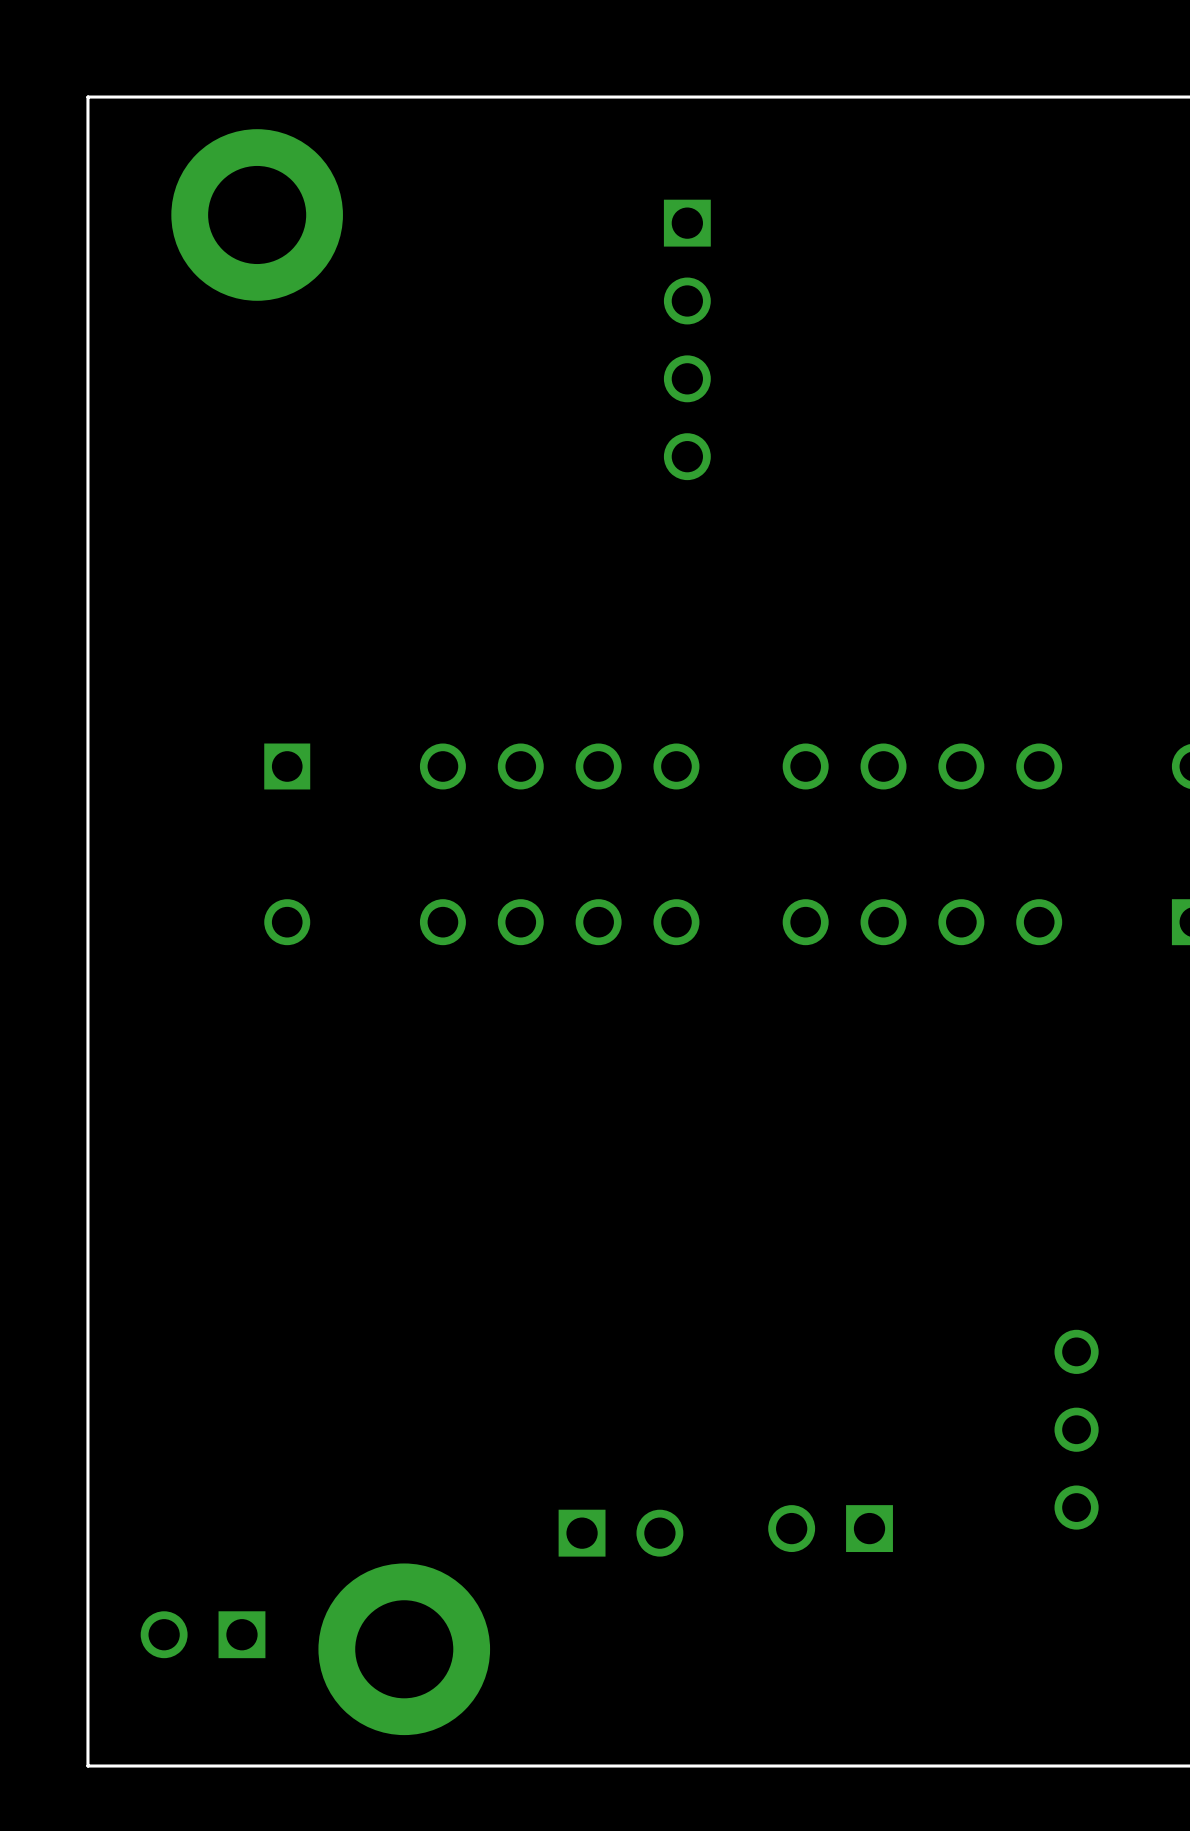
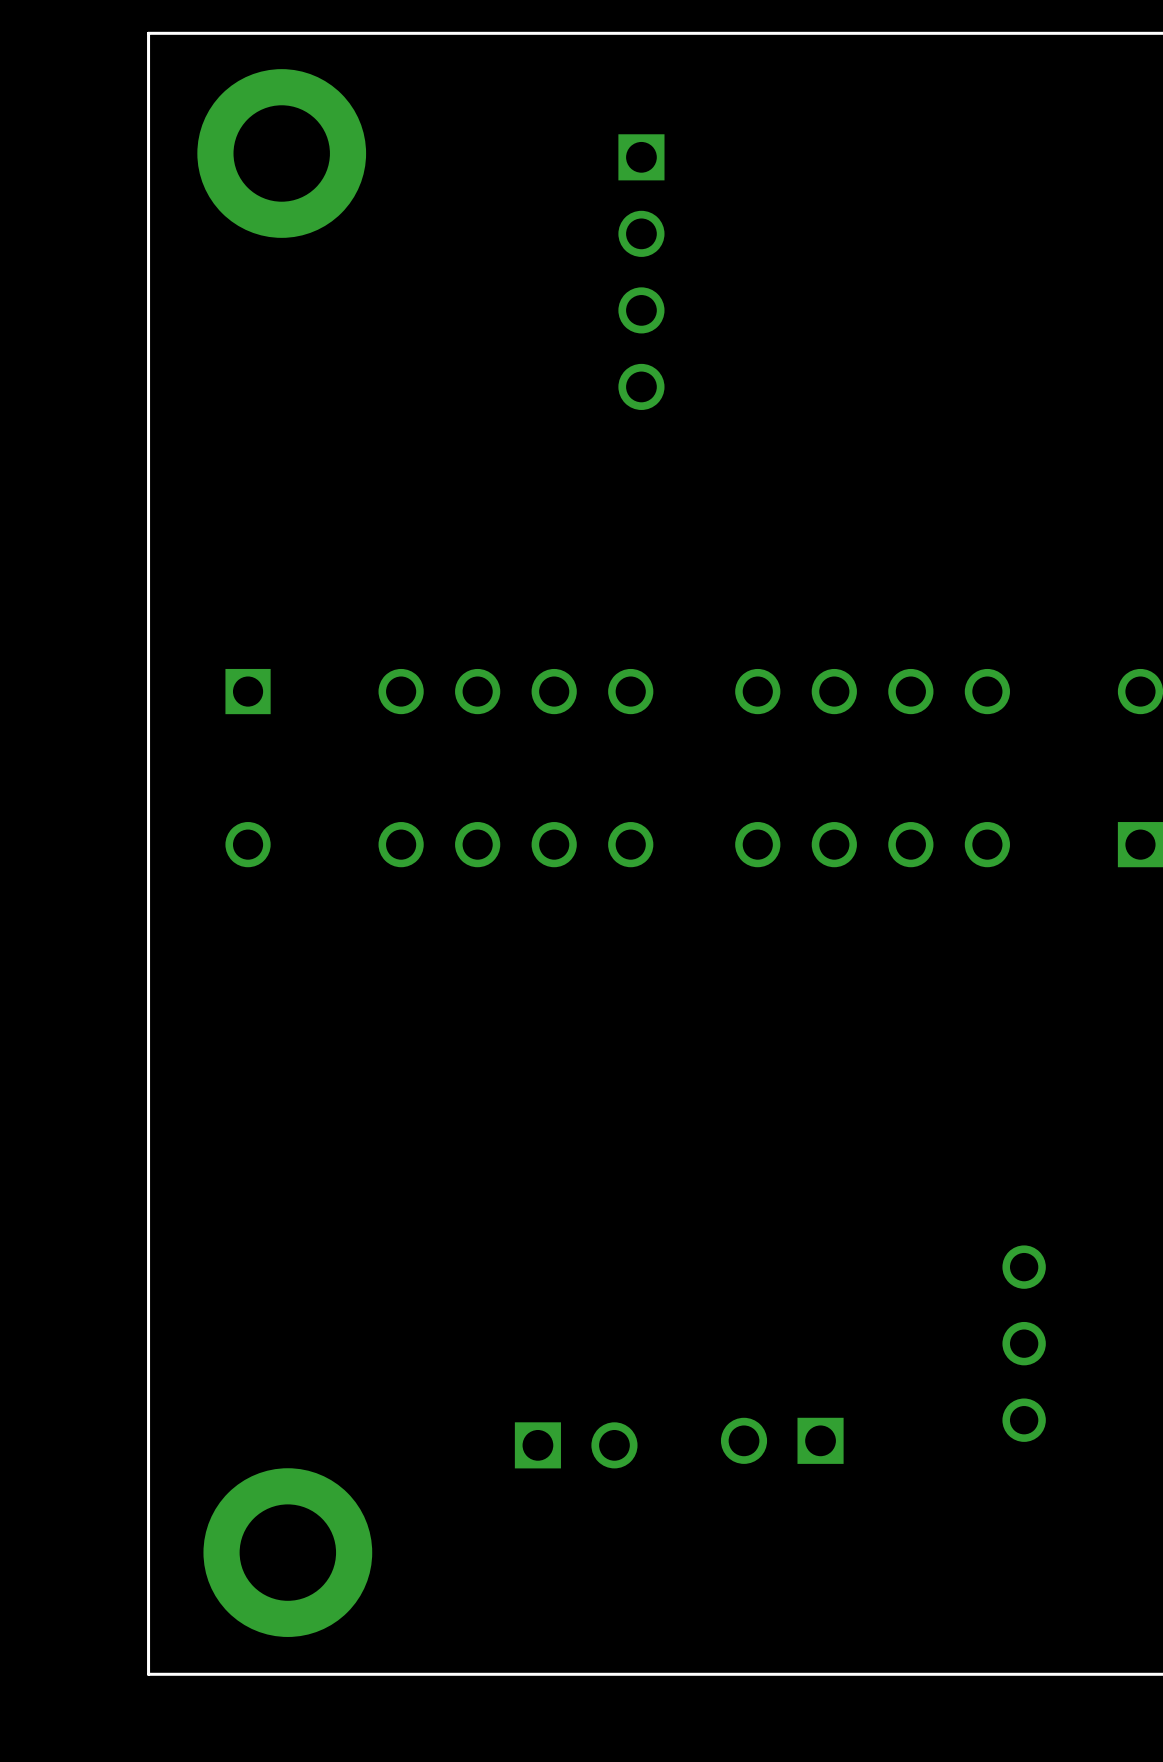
board edge: (186, 97) (87, 97) (87, 1766) (186, 1766) -> (148, 33) (148, 1674)
part position: (257, 214) -> (281, 153)
part: (203, 1634) -> none
part position: (404, 1649) -> (287, 1552)

